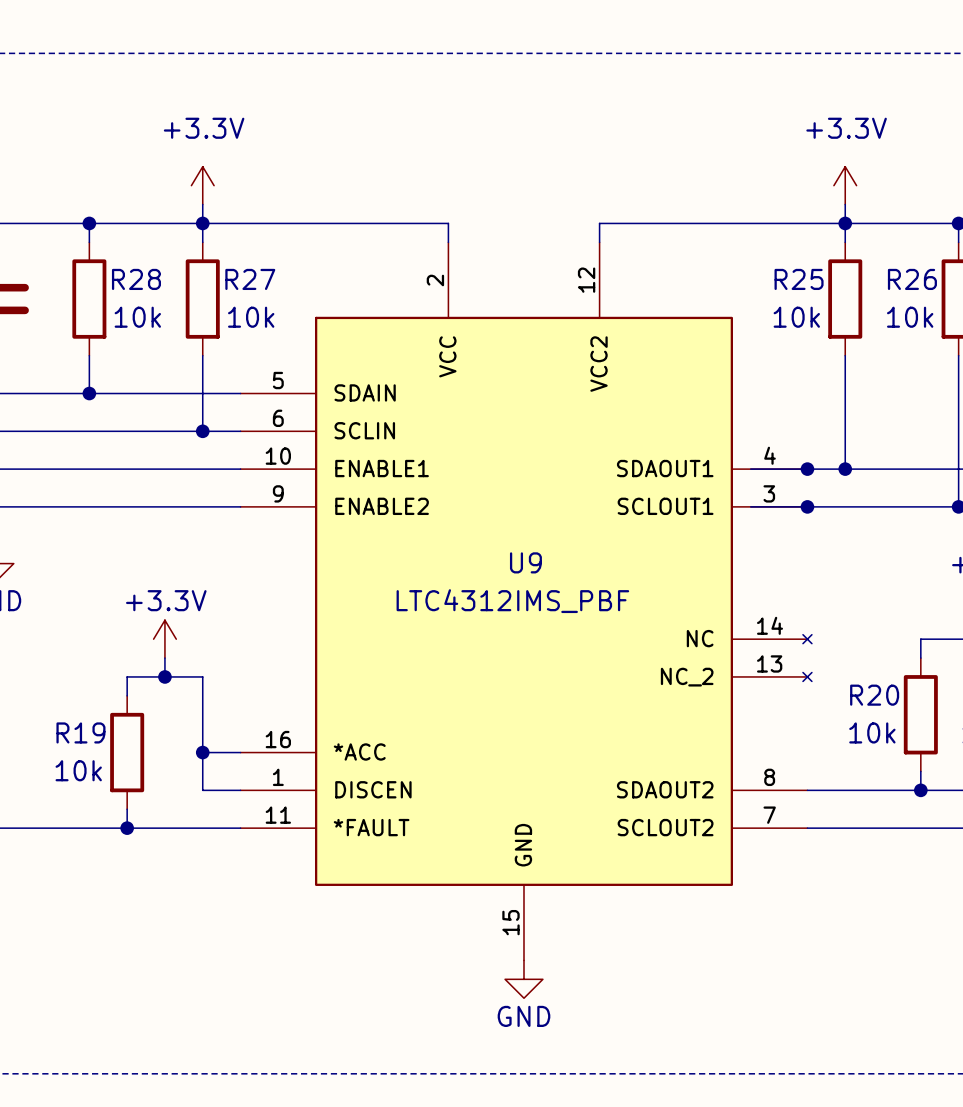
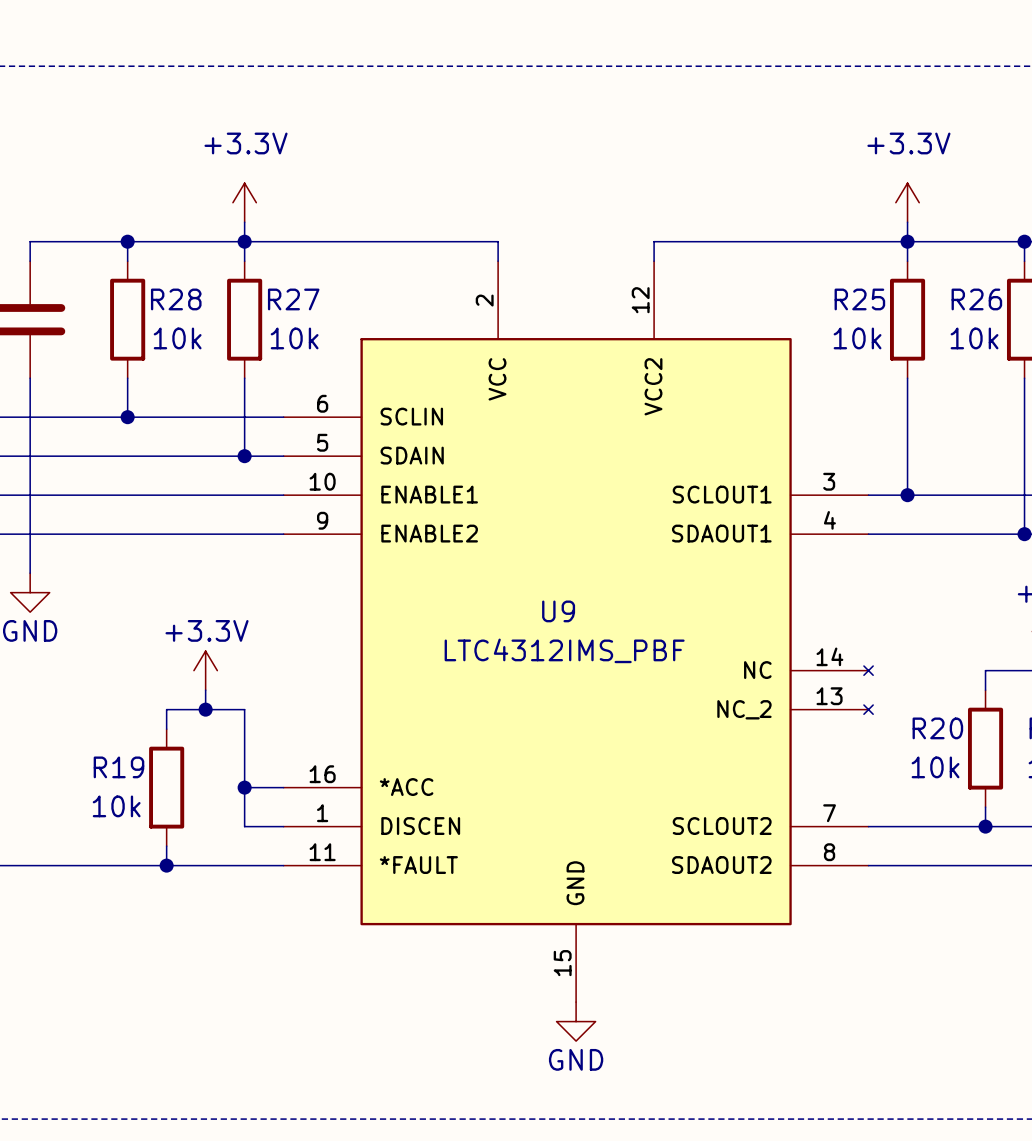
U9 symbol: [240, 242, 812, 961] -> [283, 261, 874, 1003]
junction: (807, 469) -> none
junction: (807, 506) -> none

